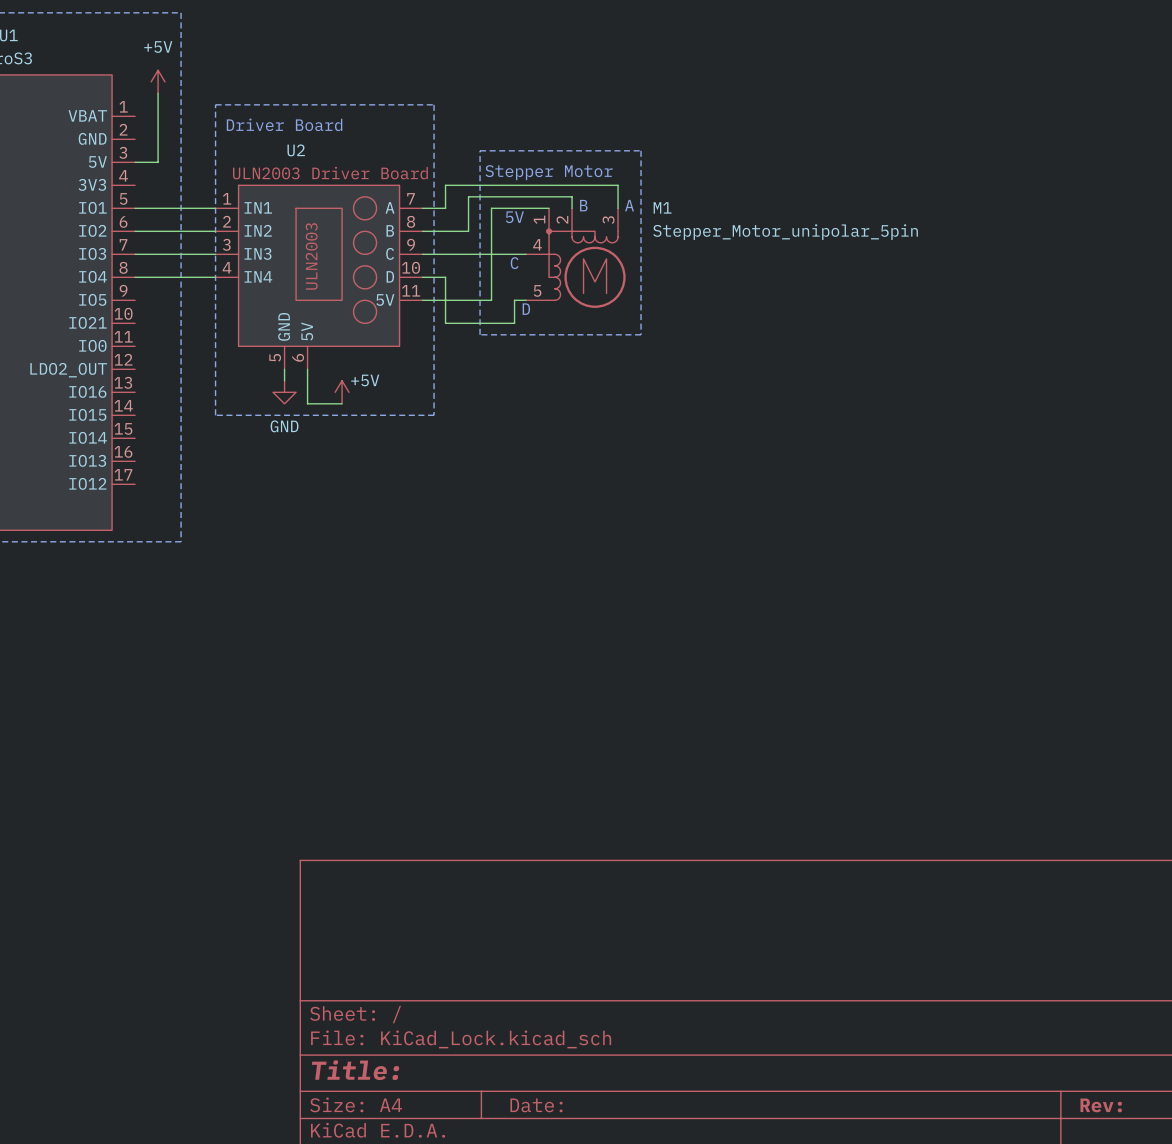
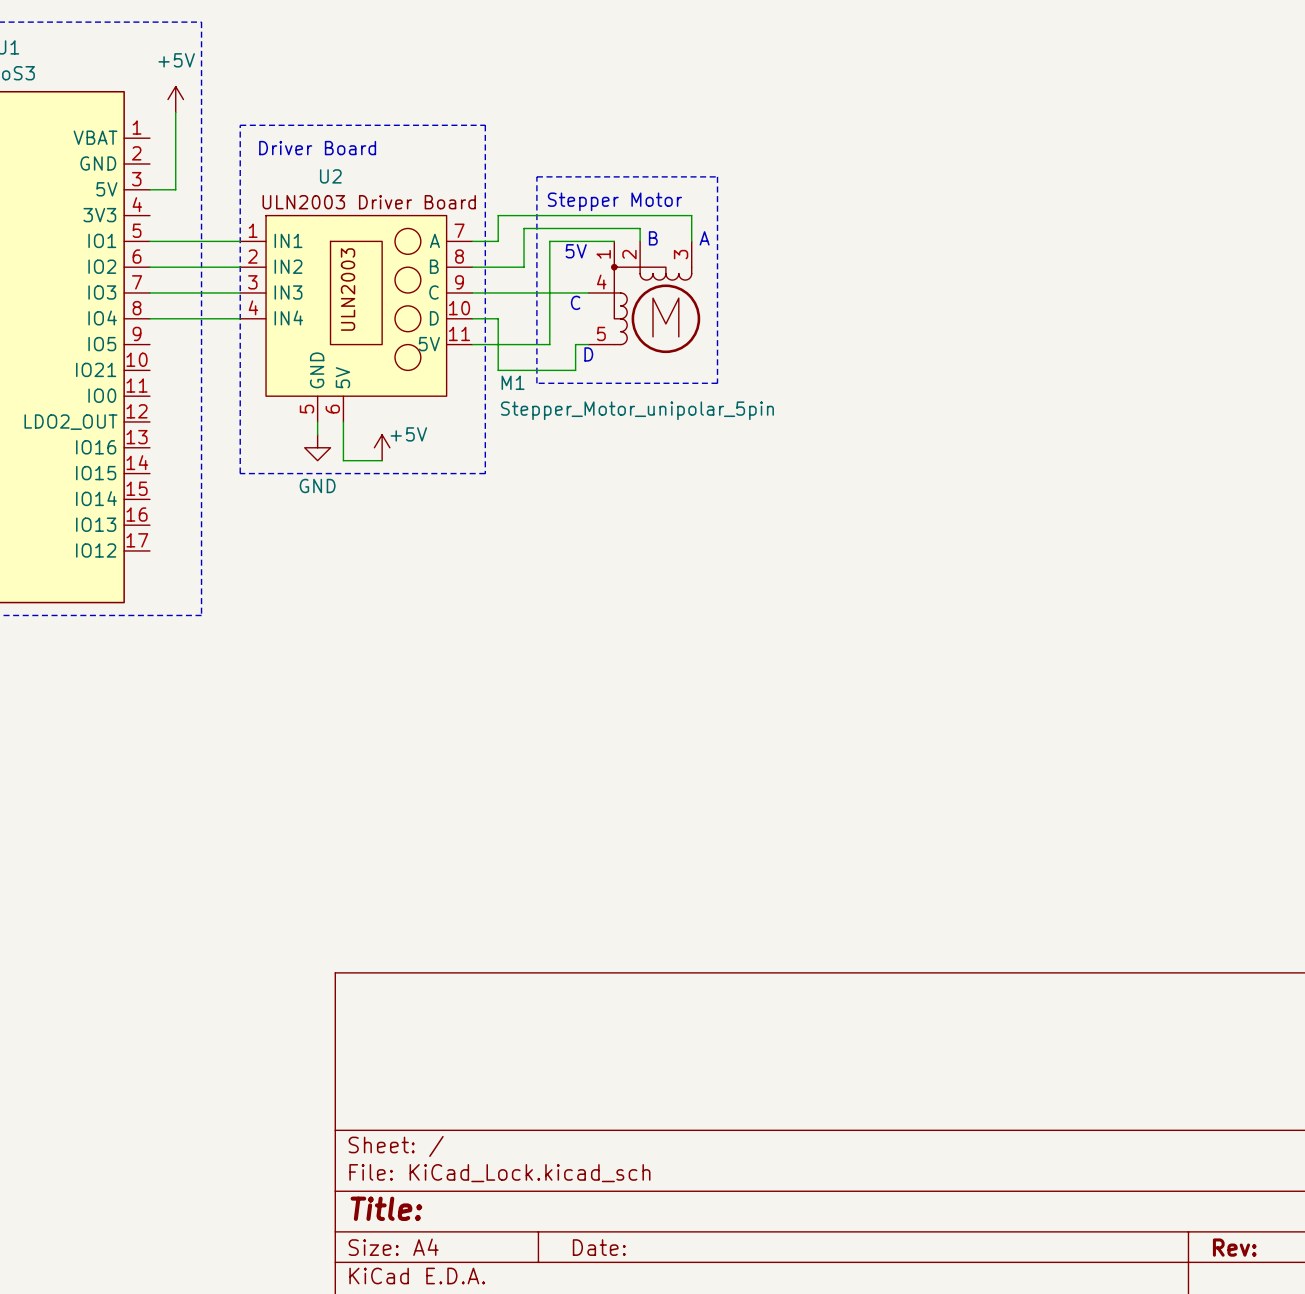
M1 name position: M1 (662, 207) -> M1 (513, 382)
M1 value position: Stepper_Motor_unipolar_5pin (785, 232) -> Stepper_Motor_unipolar_5pin (637, 410)

